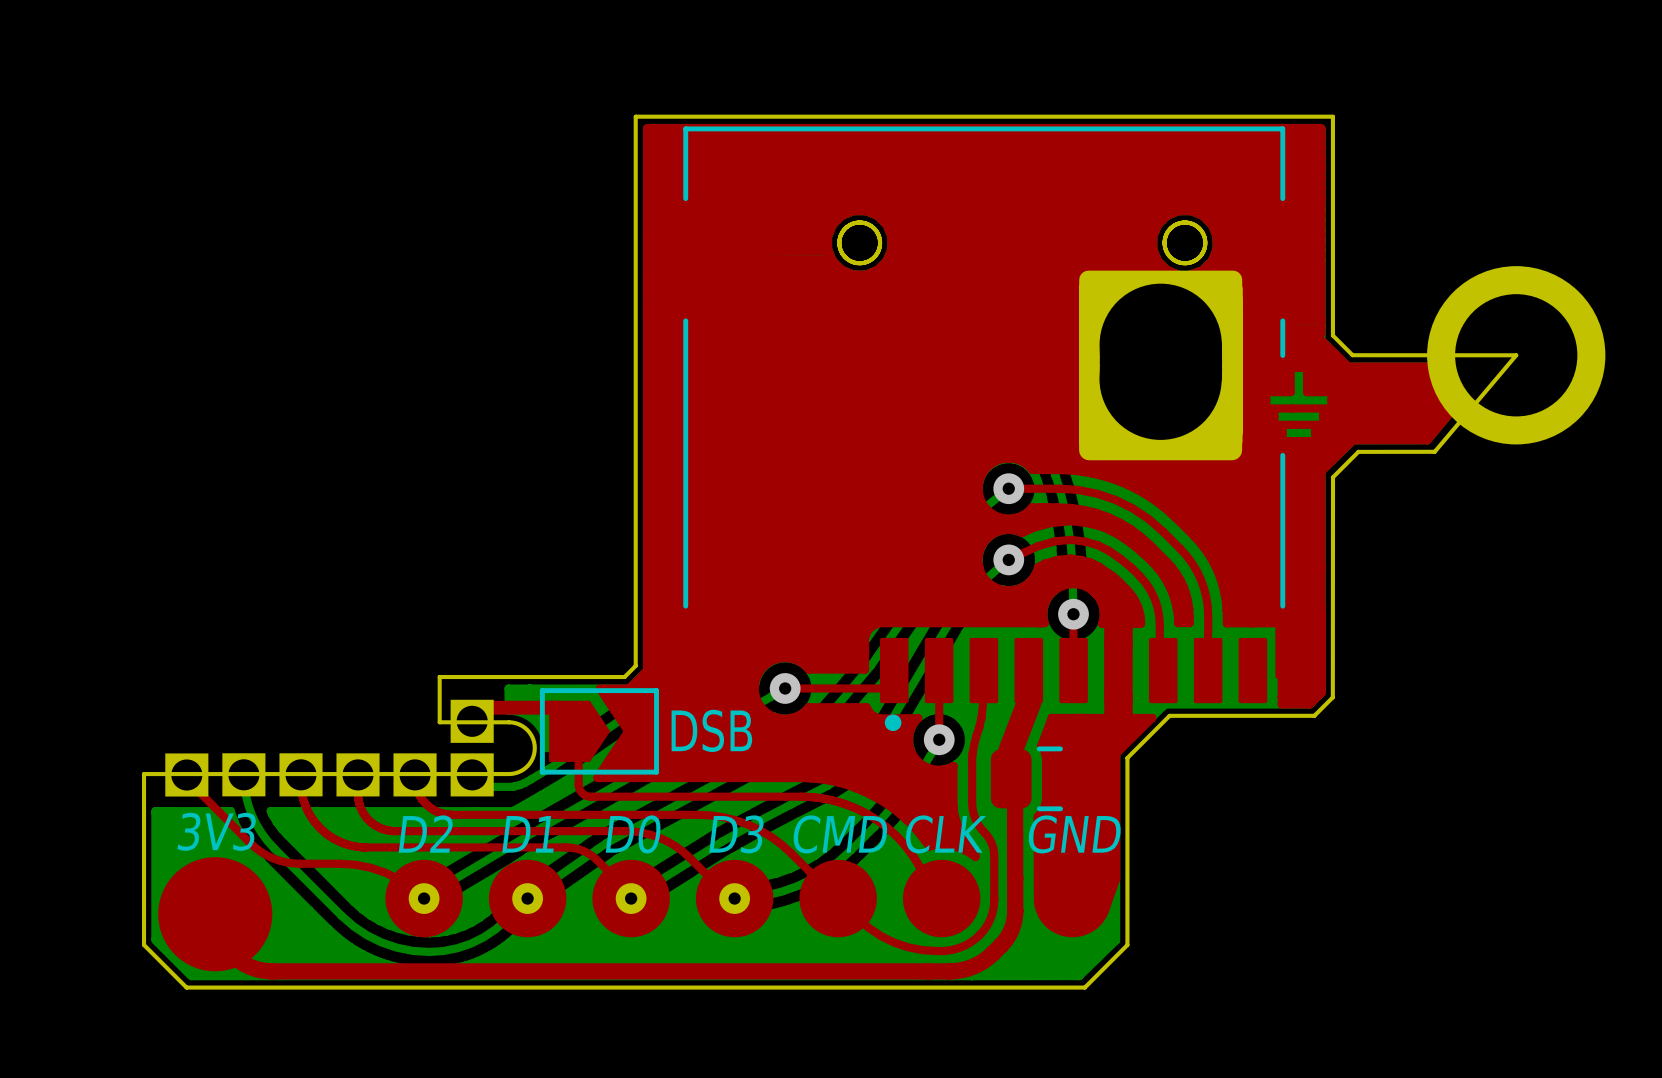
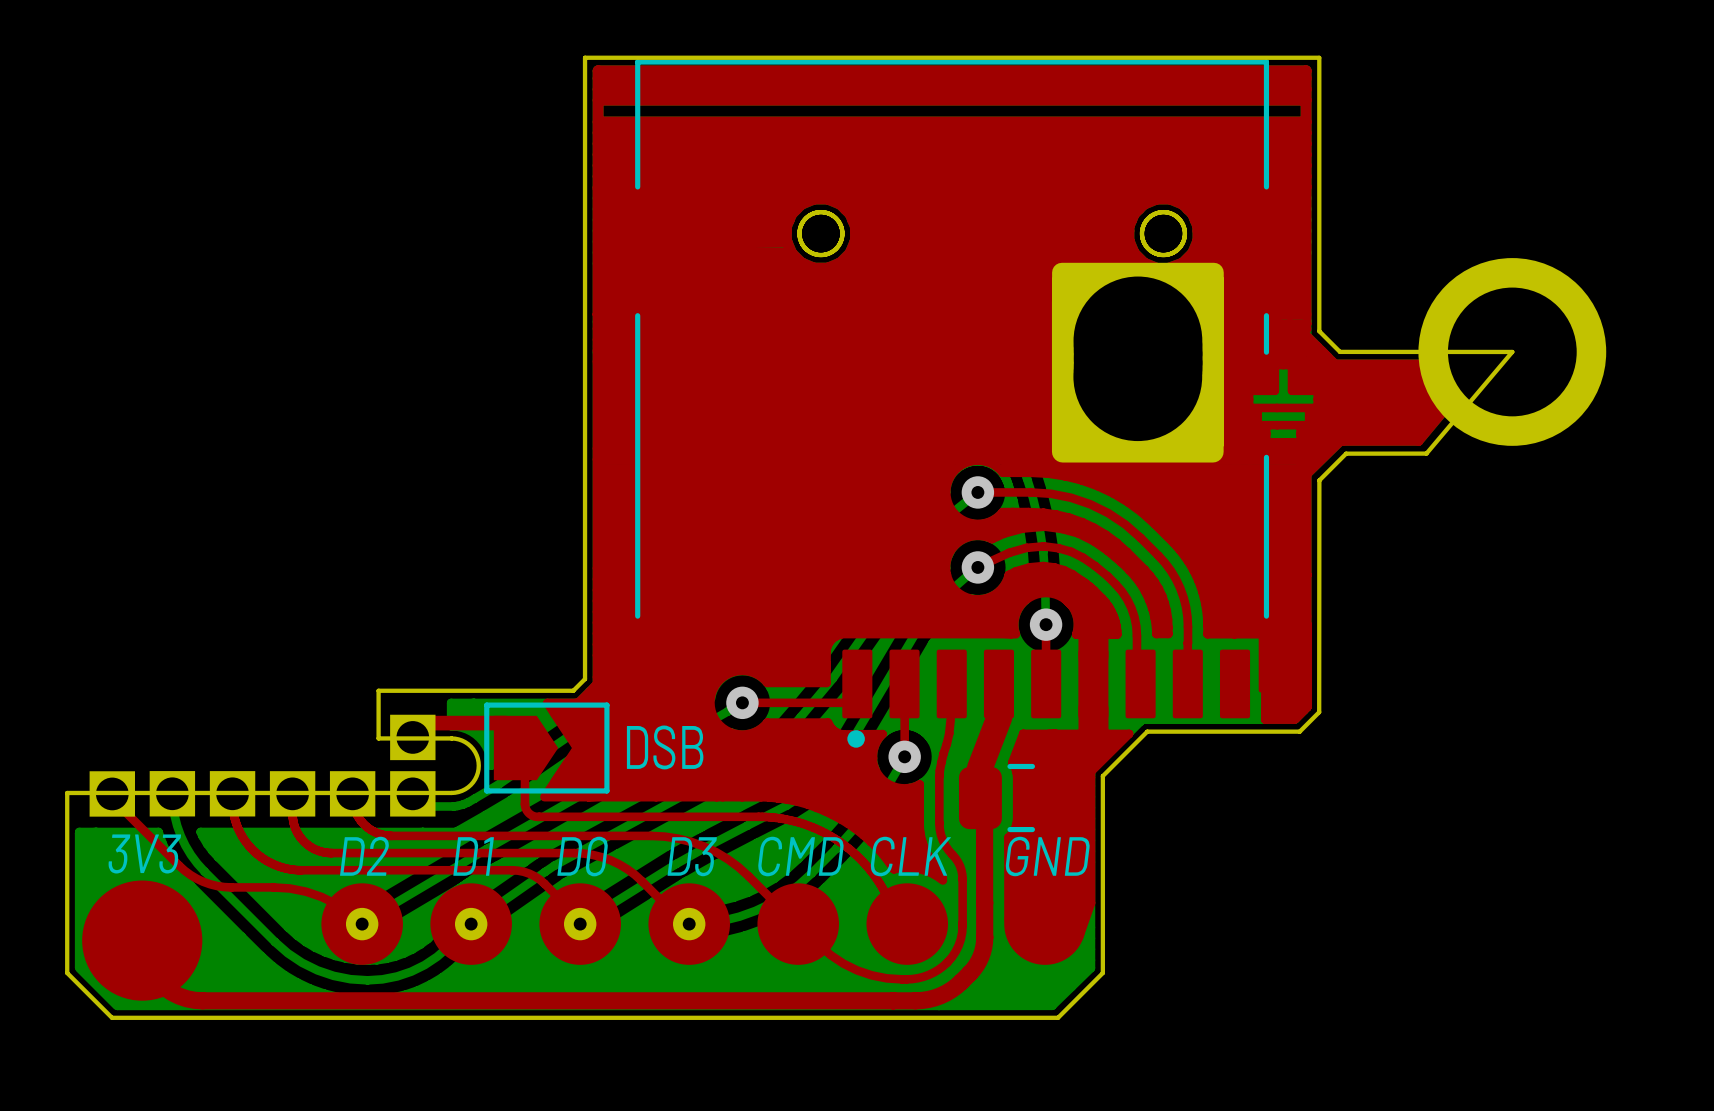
top track: none -> (598, 78) (1306, 78)
top track: none -> (598, 89) (1306, 89)
board edge: (635, 116) (1332, 116) -> (585, 100) (585, 57) (1319, 57) (1319, 100)
top track: none -> (598, 100) (1306, 100)
part footprint: [643, 126, 1325, 732] -> [593, 59, 1311, 748]
top track: (648, 129) (1320, 129) -> (598, 113) (598, 70) (1306, 70) (1306, 113)

